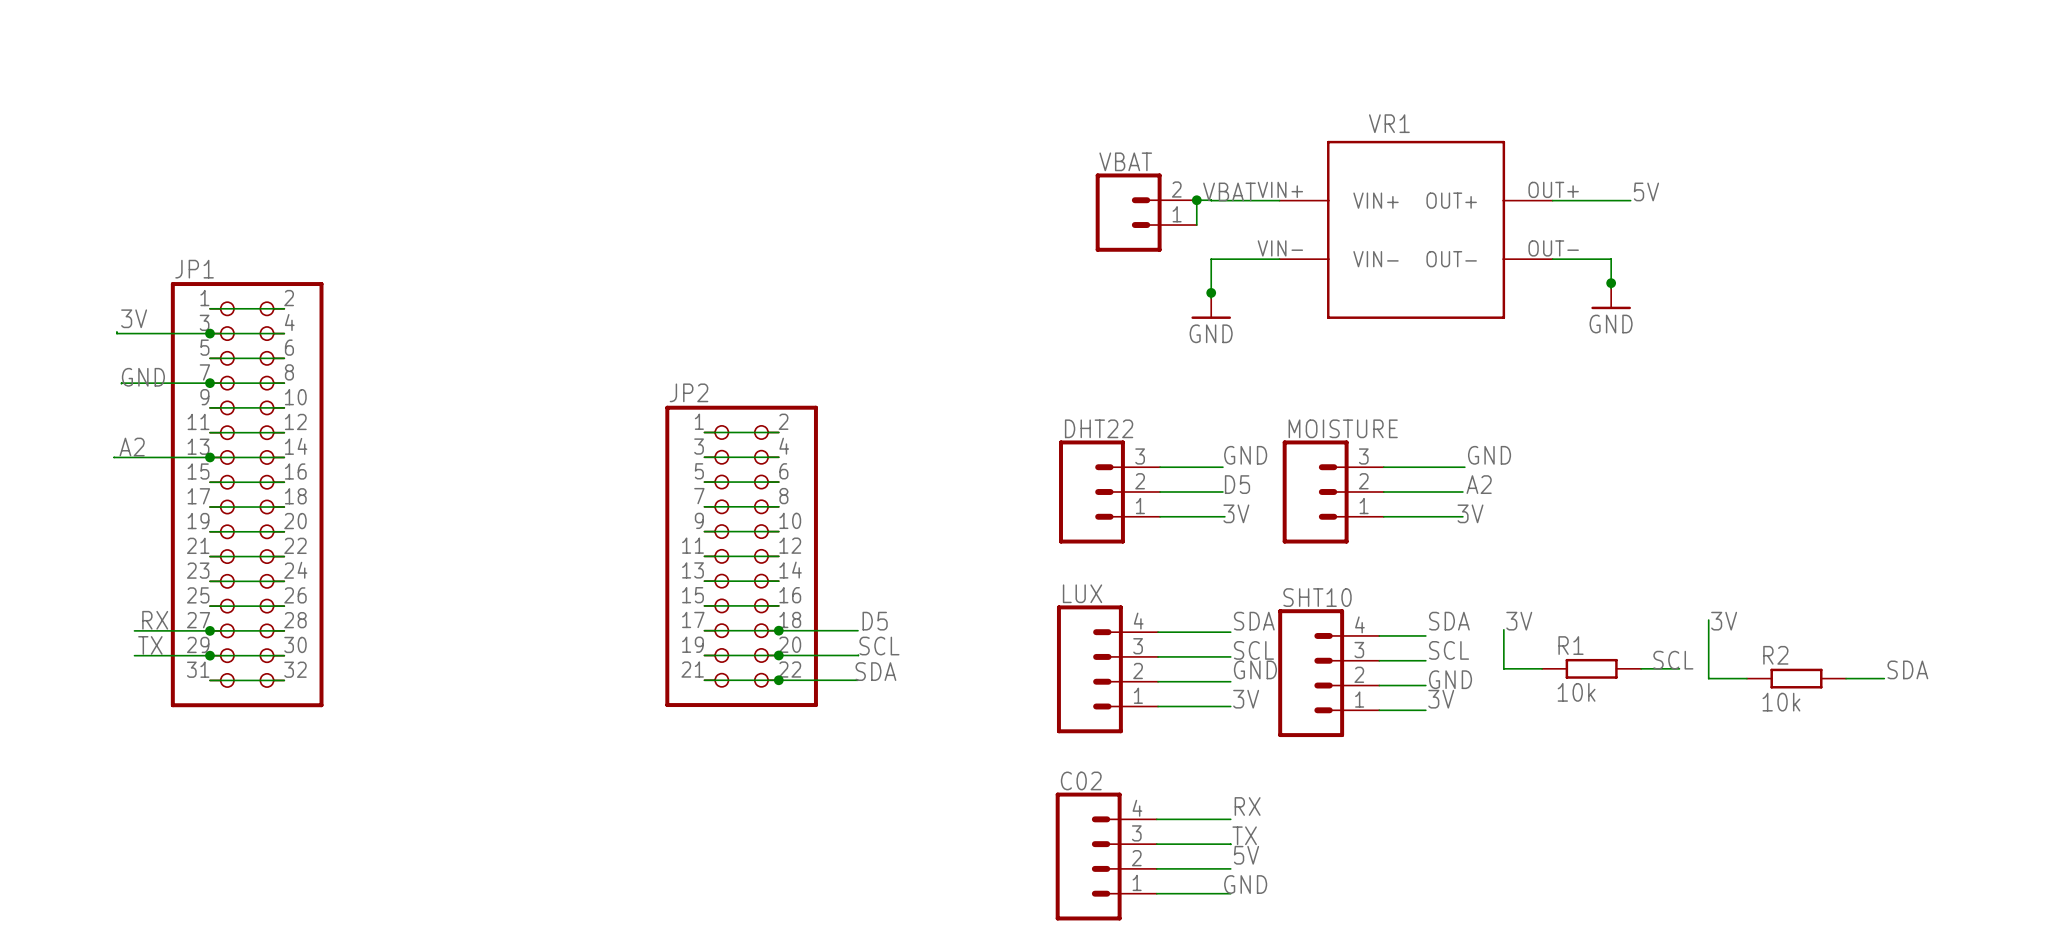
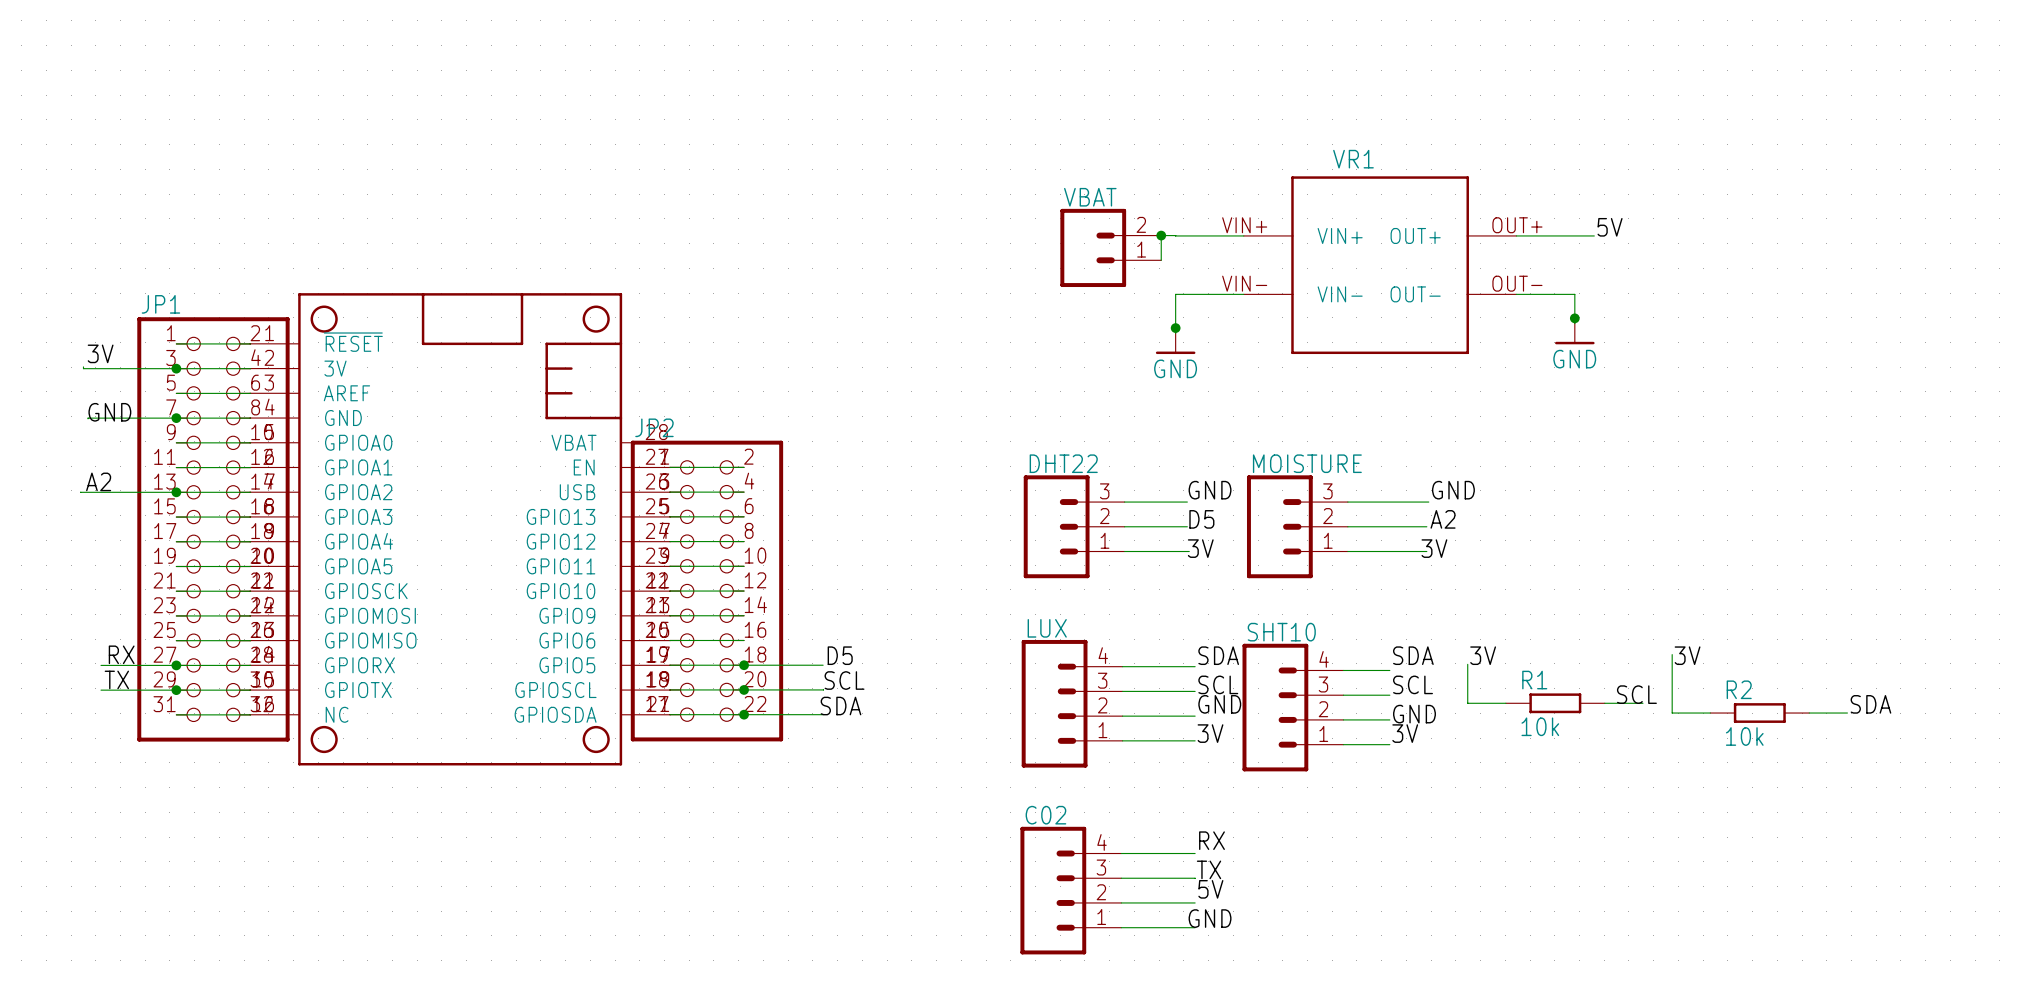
label: VBAT (1229, 191) -> none
part: none -> (460, 529)

